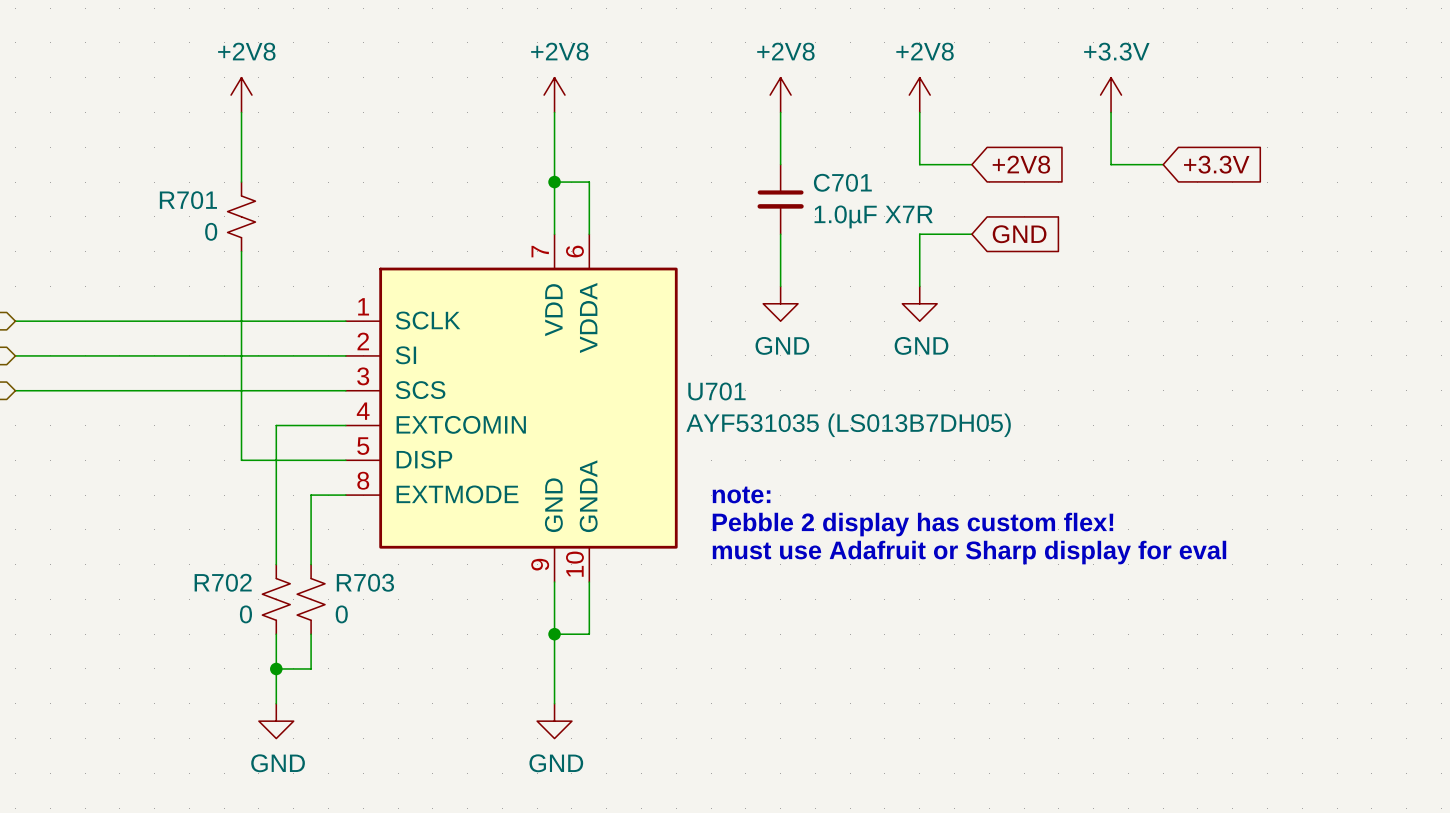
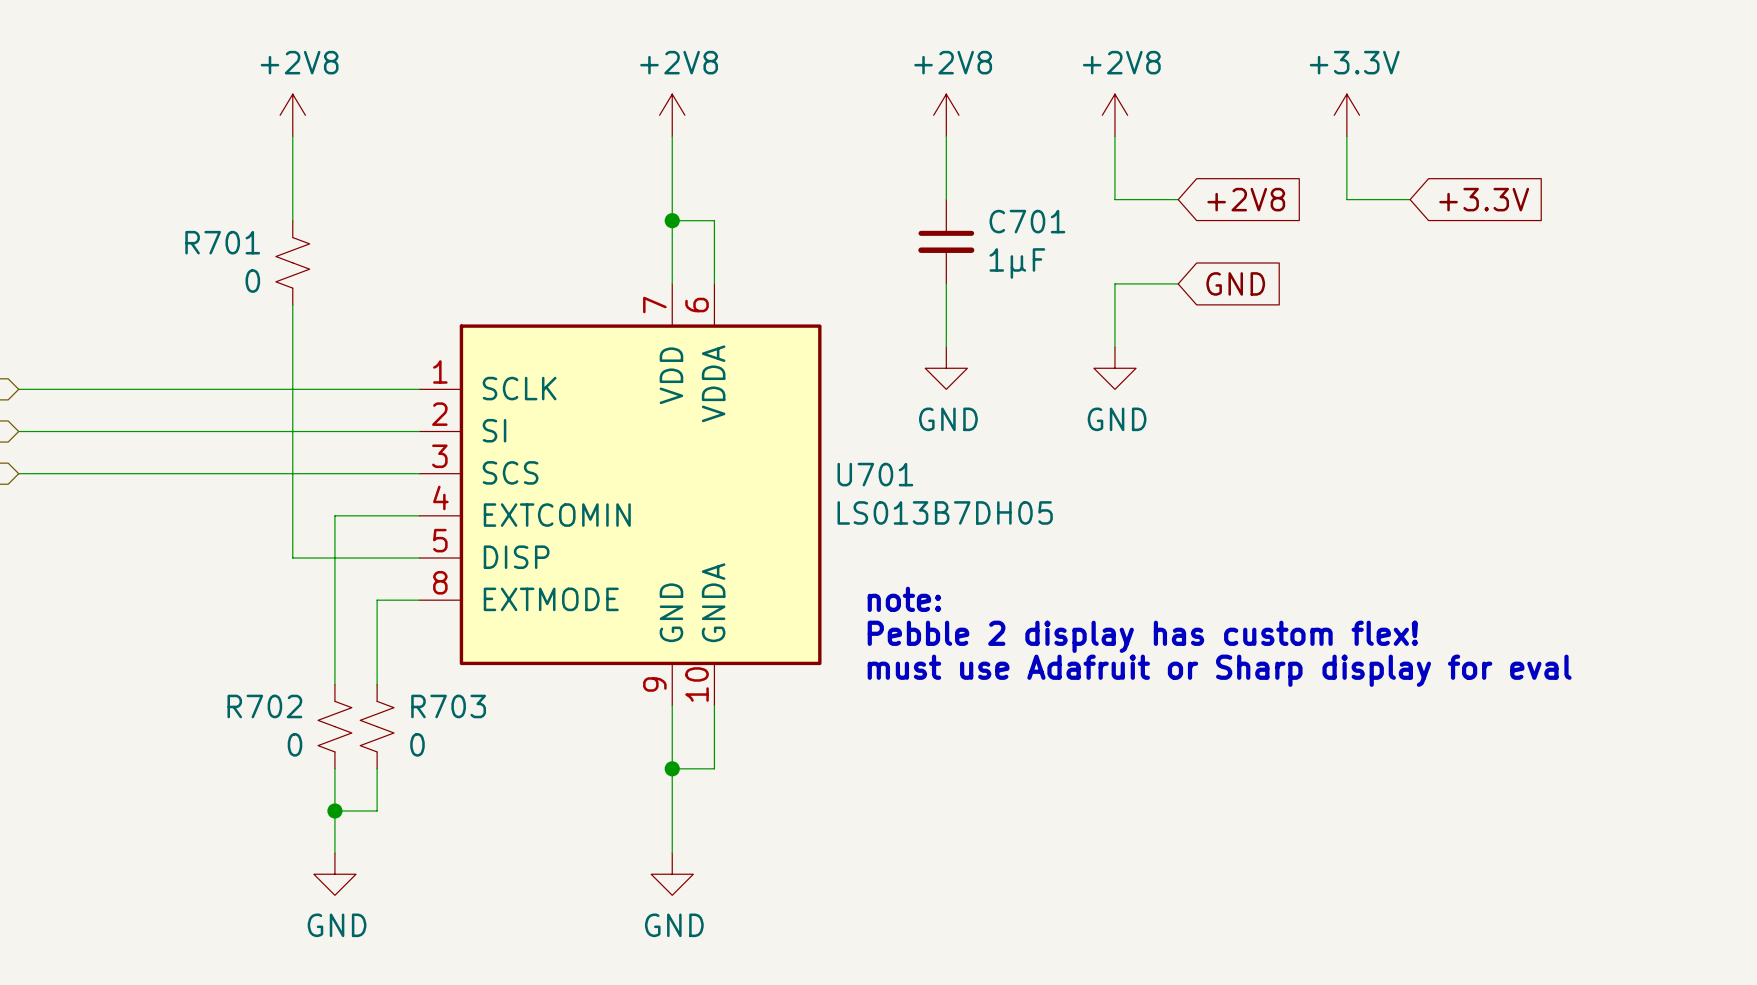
C701 value: 1.0µF X7R (873, 216) -> 1µF (1017, 263)
U701 value: AYF531035 (LS013B7DH05) (848, 425) -> LS013B7DH05 (945, 512)

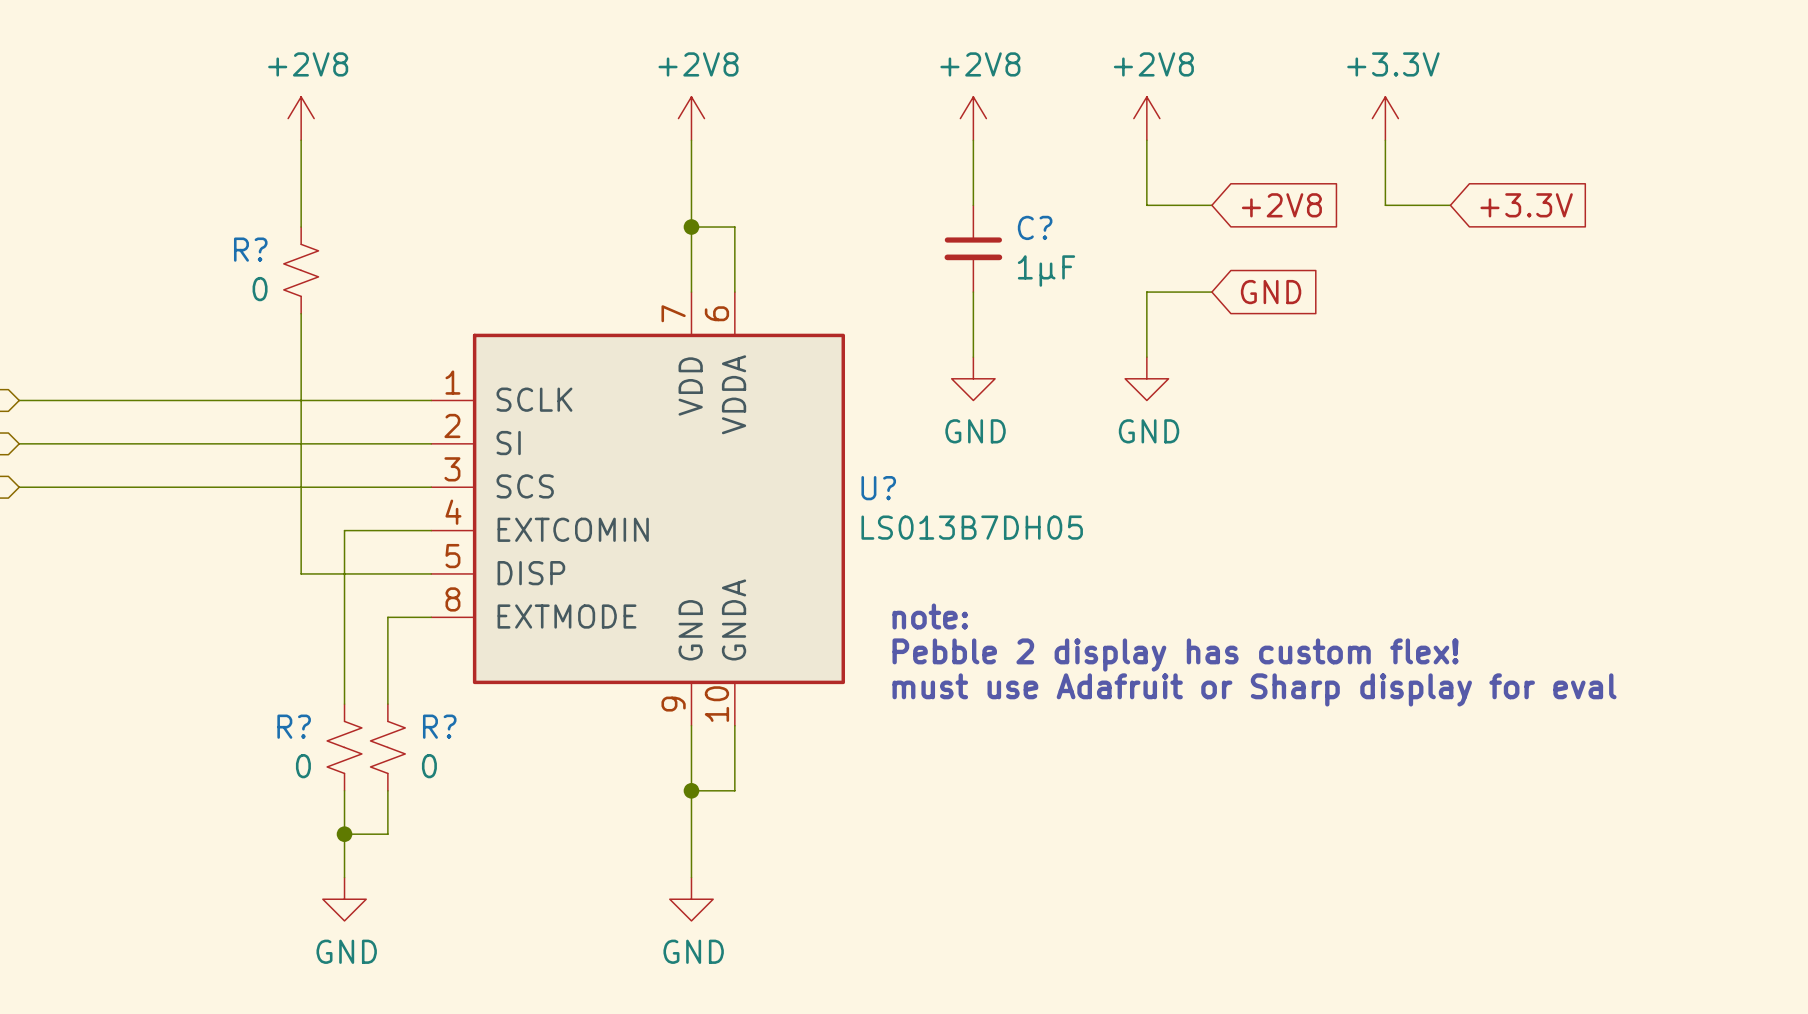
C701 name: C701 (1027, 221) -> C? (1035, 227)
R701 name: R701 (222, 242) -> R? (250, 249)
U701 name: U701 (875, 474) -> U? (878, 488)
R702 name: R702 (264, 706) -> R? (294, 726)
R703 name: R703 (448, 706) -> R? (439, 726)

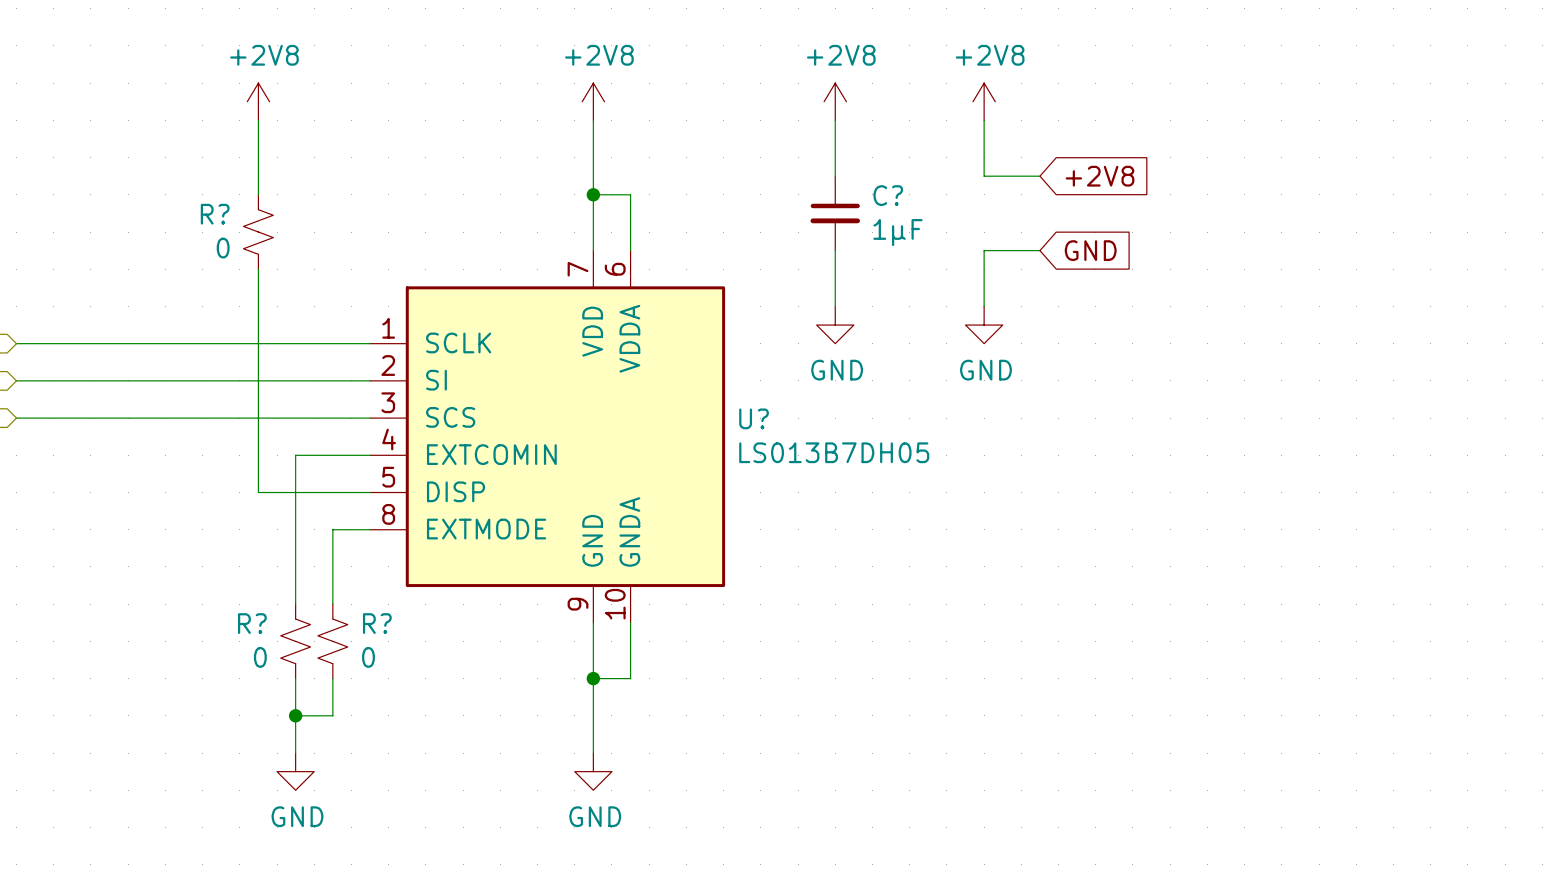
power symbol: +3.3V (1385, 118) -> none
wire: (1385, 140) (1385, 205) (1450, 205) -> none
global label: +3.3V (1526, 205) -> none
text: note: (930, 616) -> none
text: Pebble 2 display has custom flex! (1175, 655) -> none
text: must use Adafruit or Sharp display for eval (1254, 689) -> none

